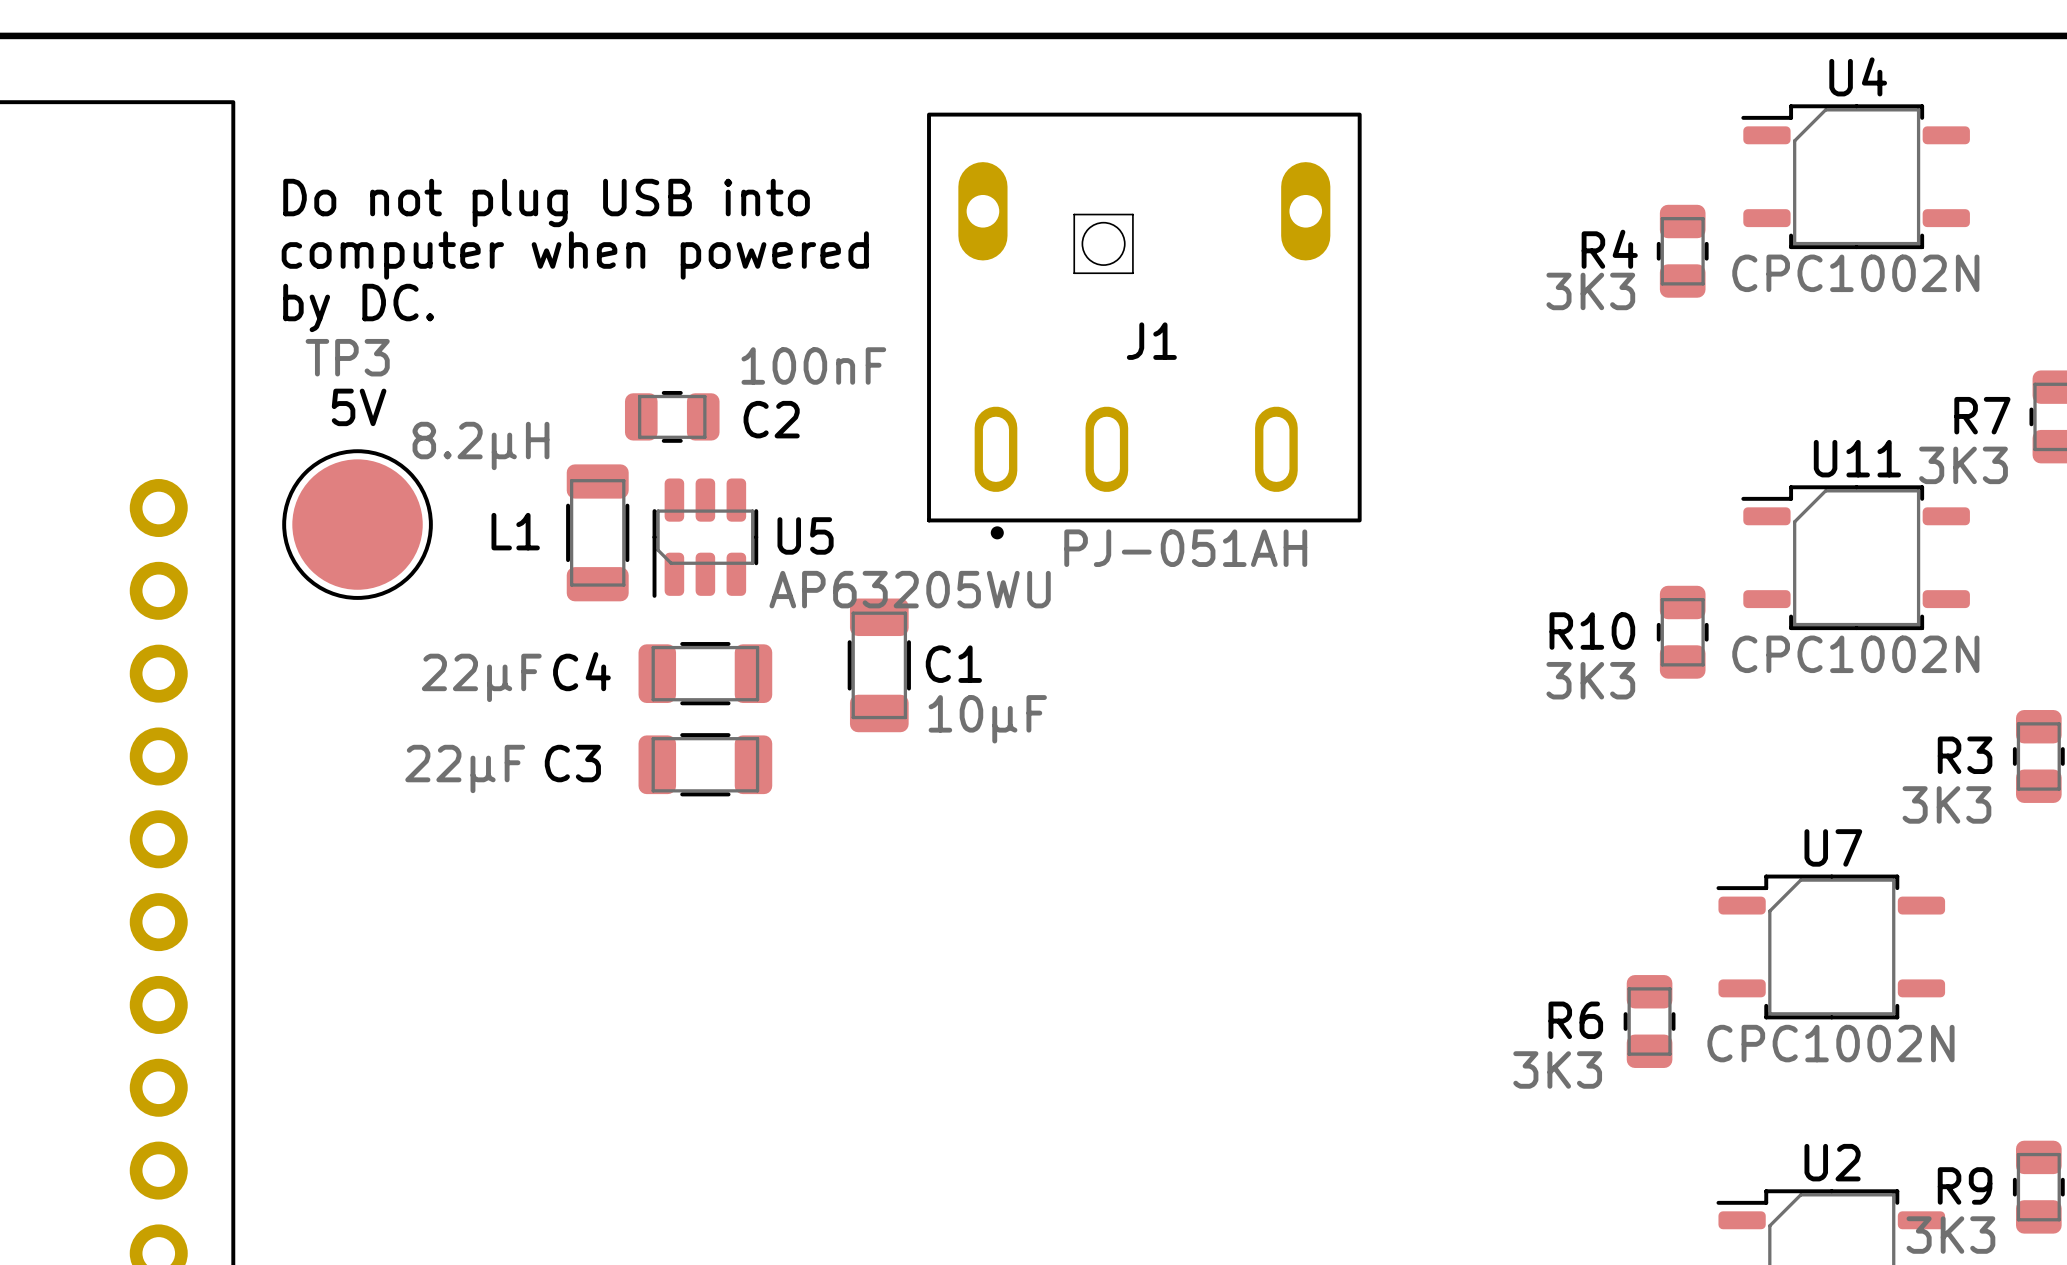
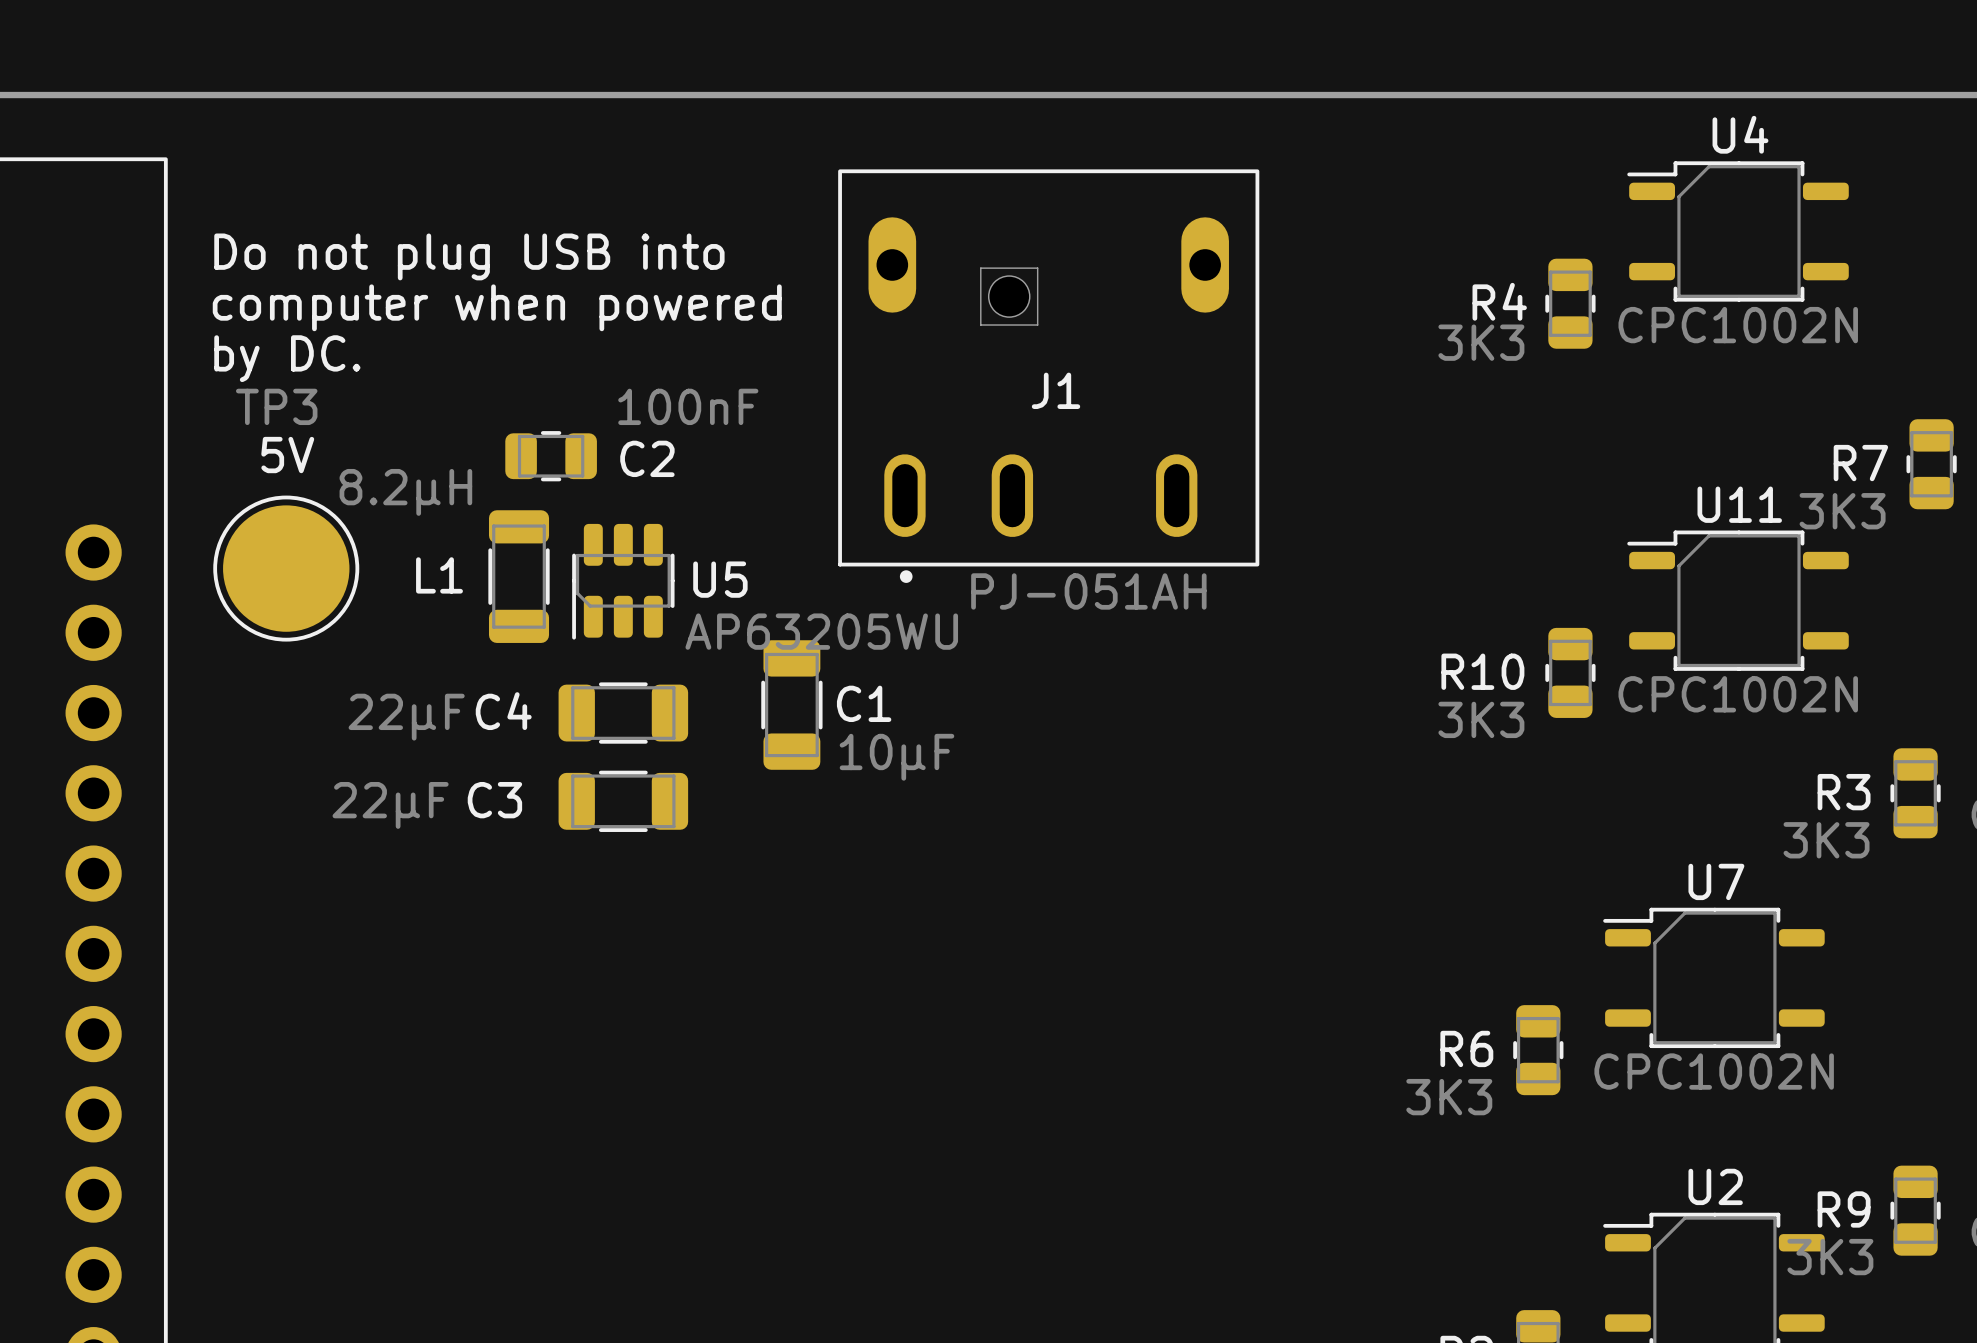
C2 position: (672, 416) -> (551, 456)

